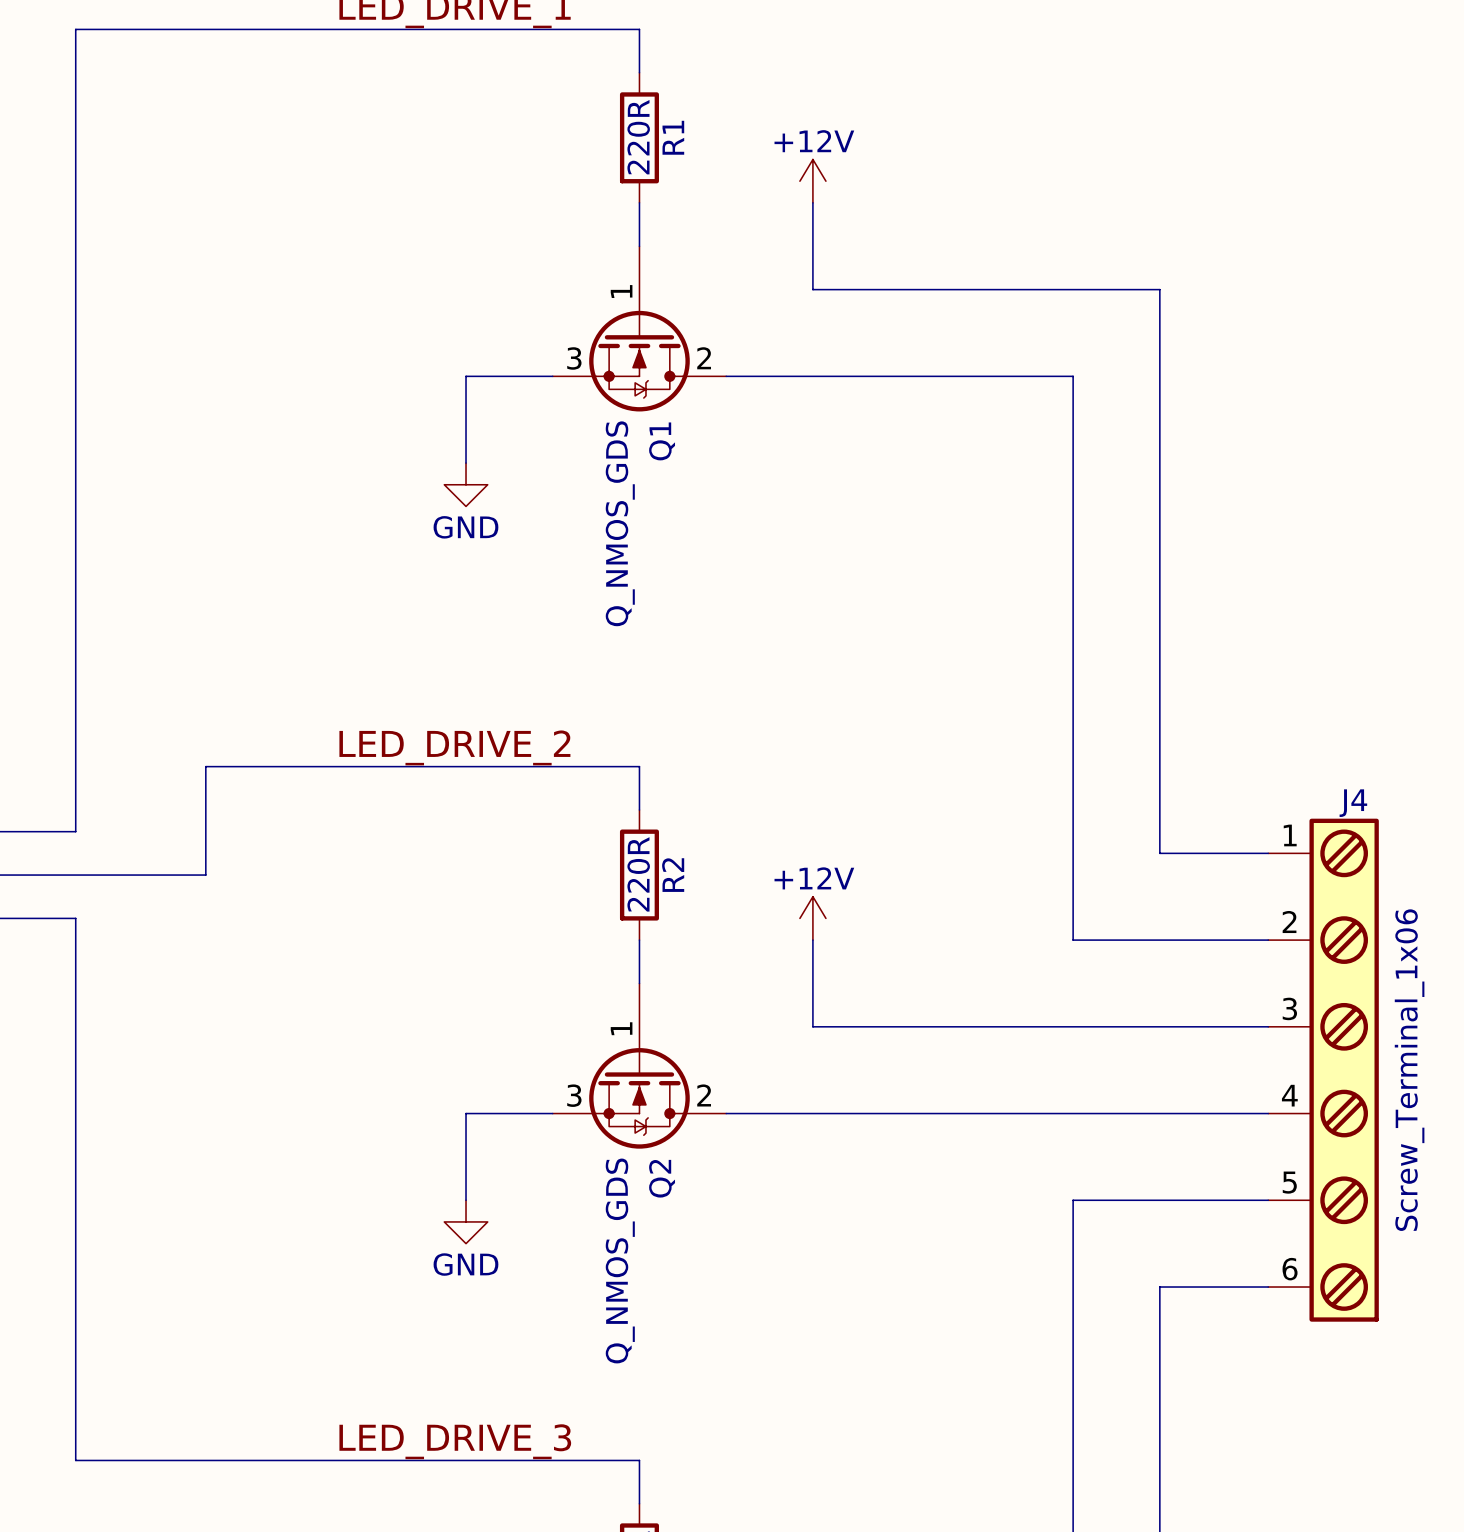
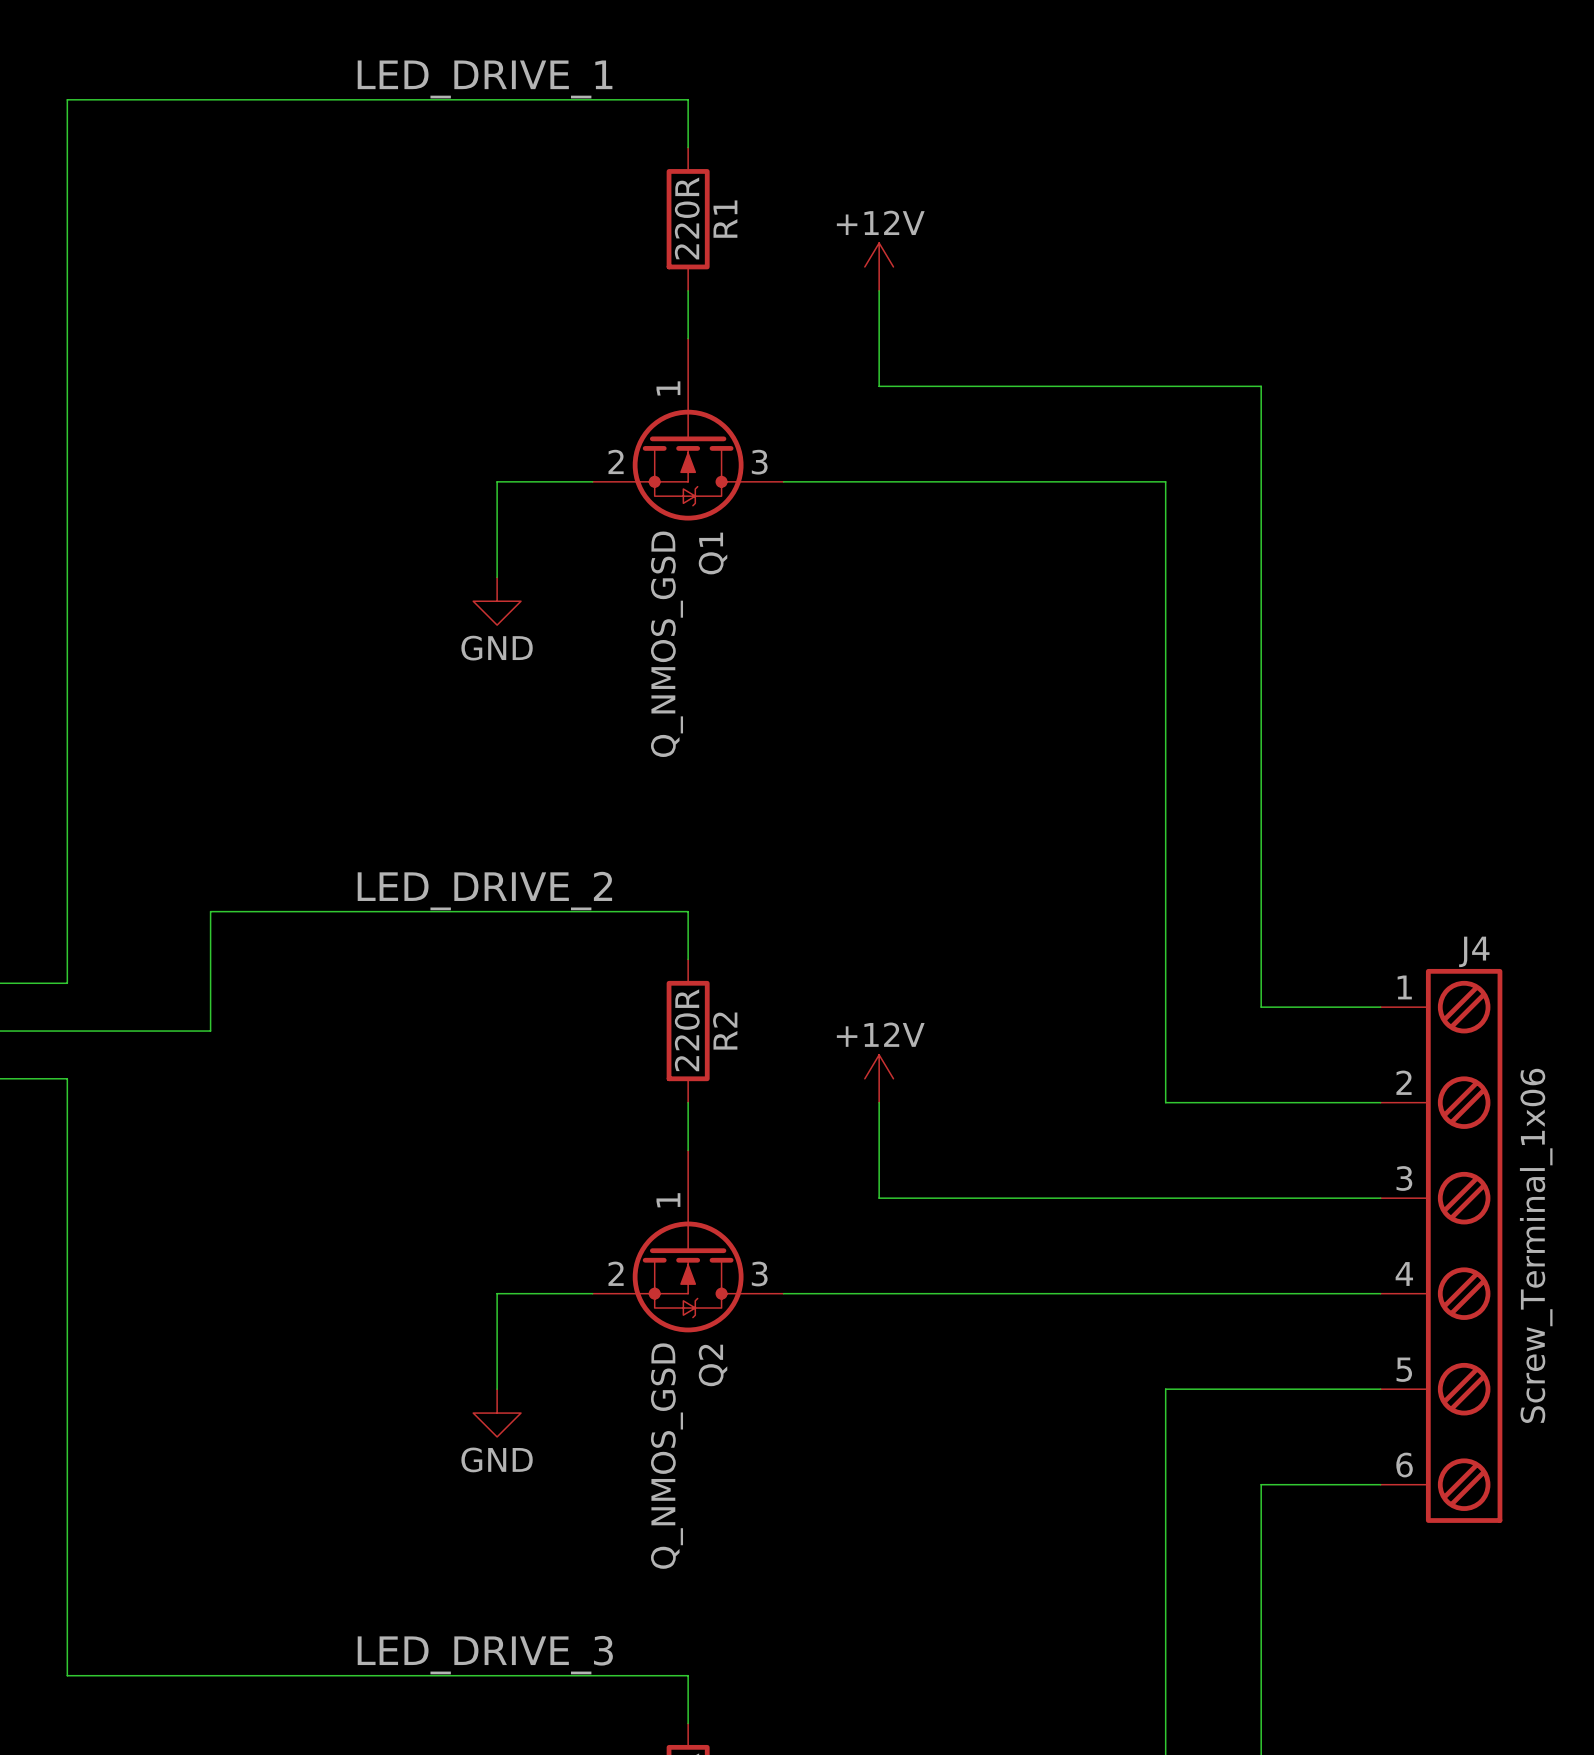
Q1 pin number: 3 (574, 358) -> 2 (616, 461)
Q1 pin number: 2 (704, 358) -> 3 (759, 462)
Q1 value: Q_NMOS_GDS (620, 523) -> Q_NMOS_GSD (667, 644)
Q2 pin number: 3 (574, 1095) -> 2 (616, 1273)
Q2 pin number: 2 (704, 1095) -> 3 (759, 1274)
Q2 value: Q_NMOS_GDS (620, 1260) -> Q_NMOS_GSD (667, 1456)

